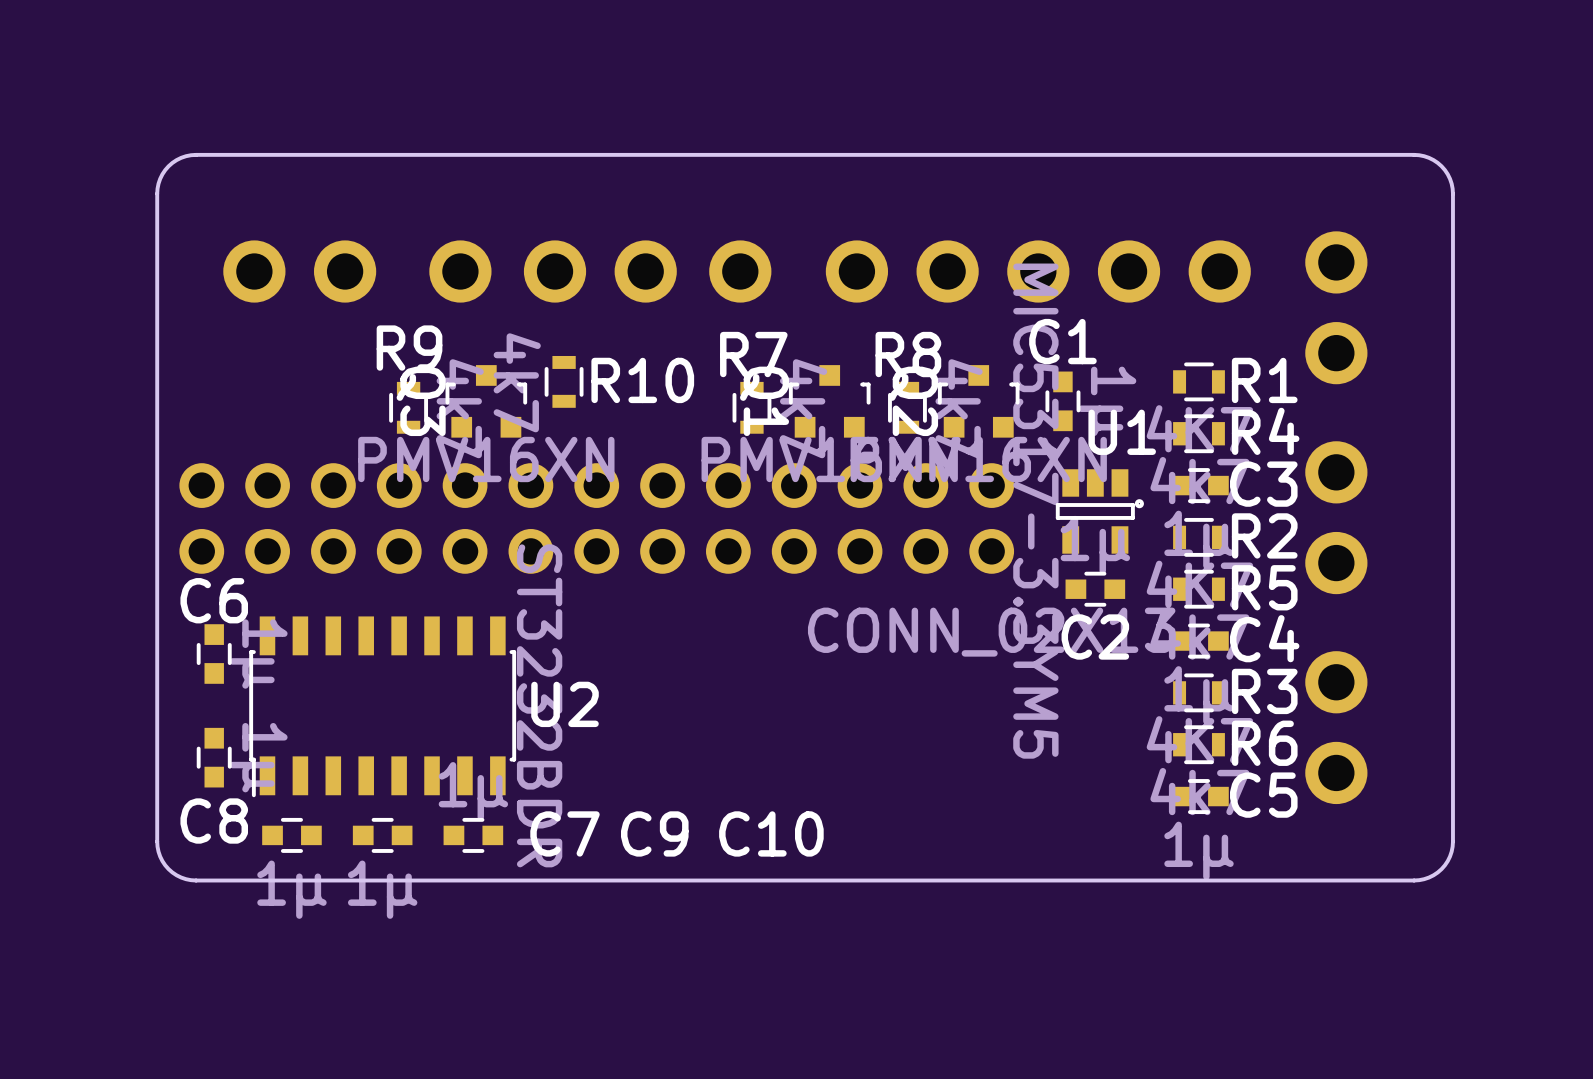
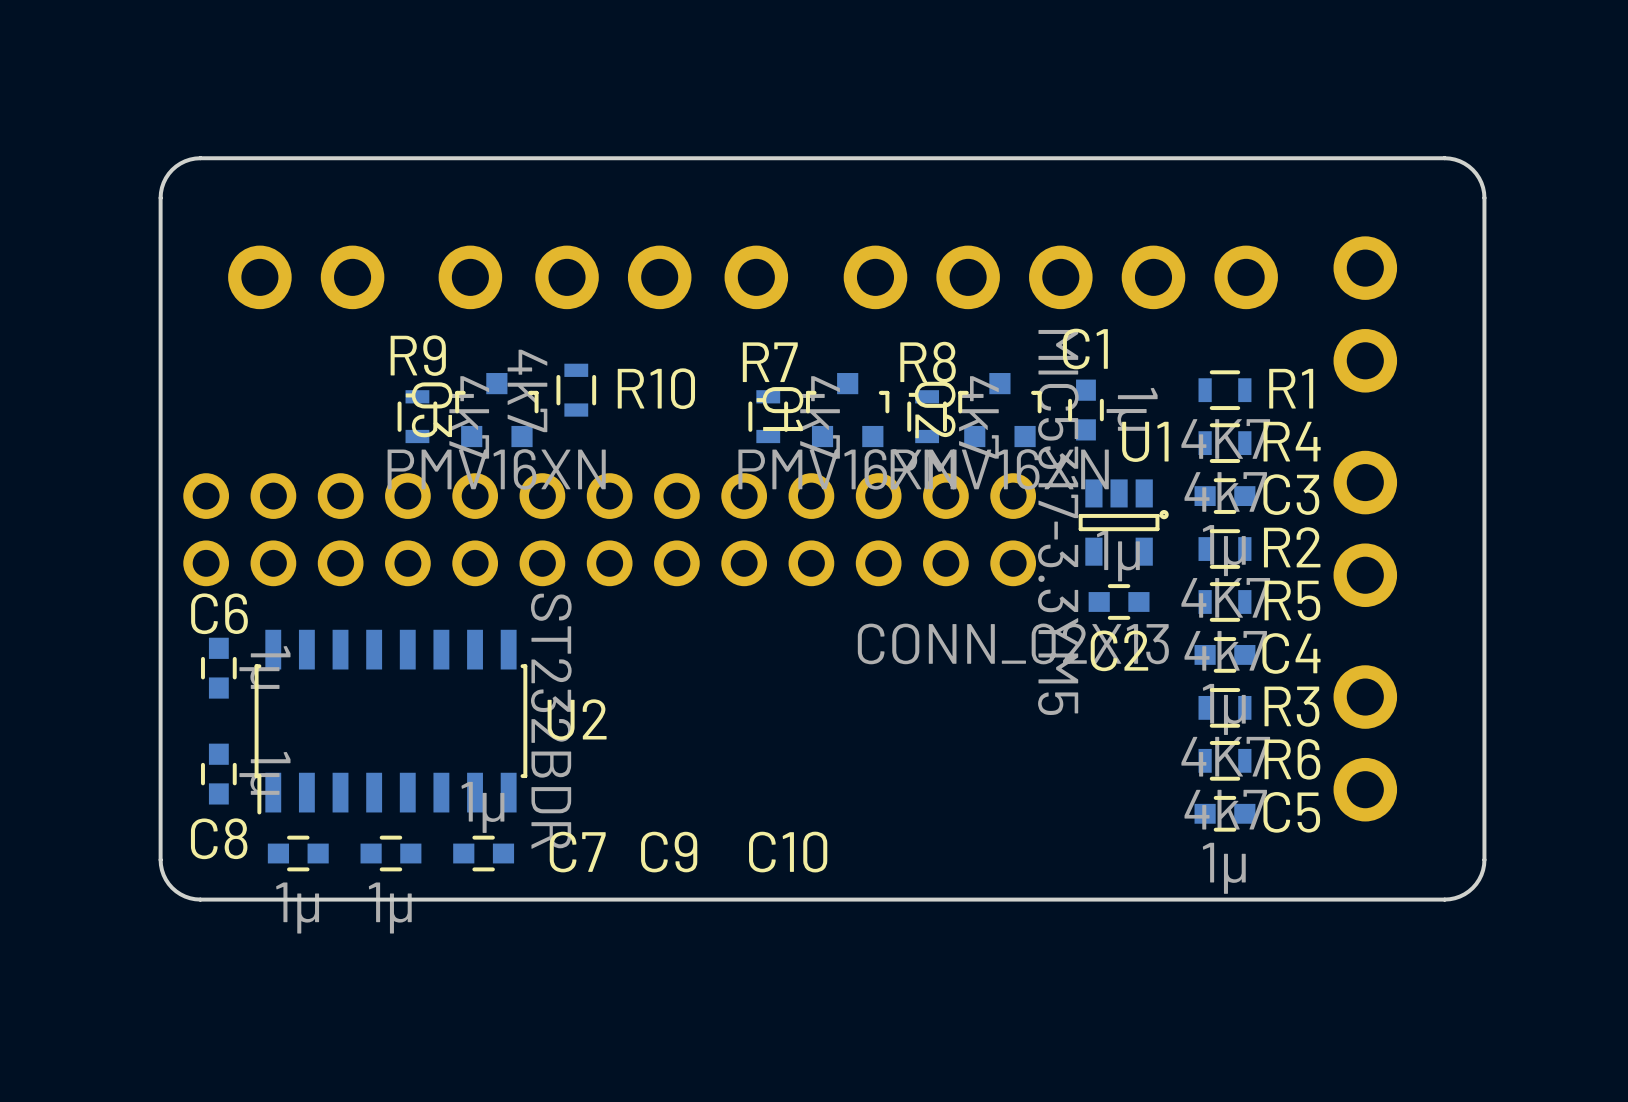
U2 value: ST3232BDR (539, 705) -> ST232BDR (551, 721)

